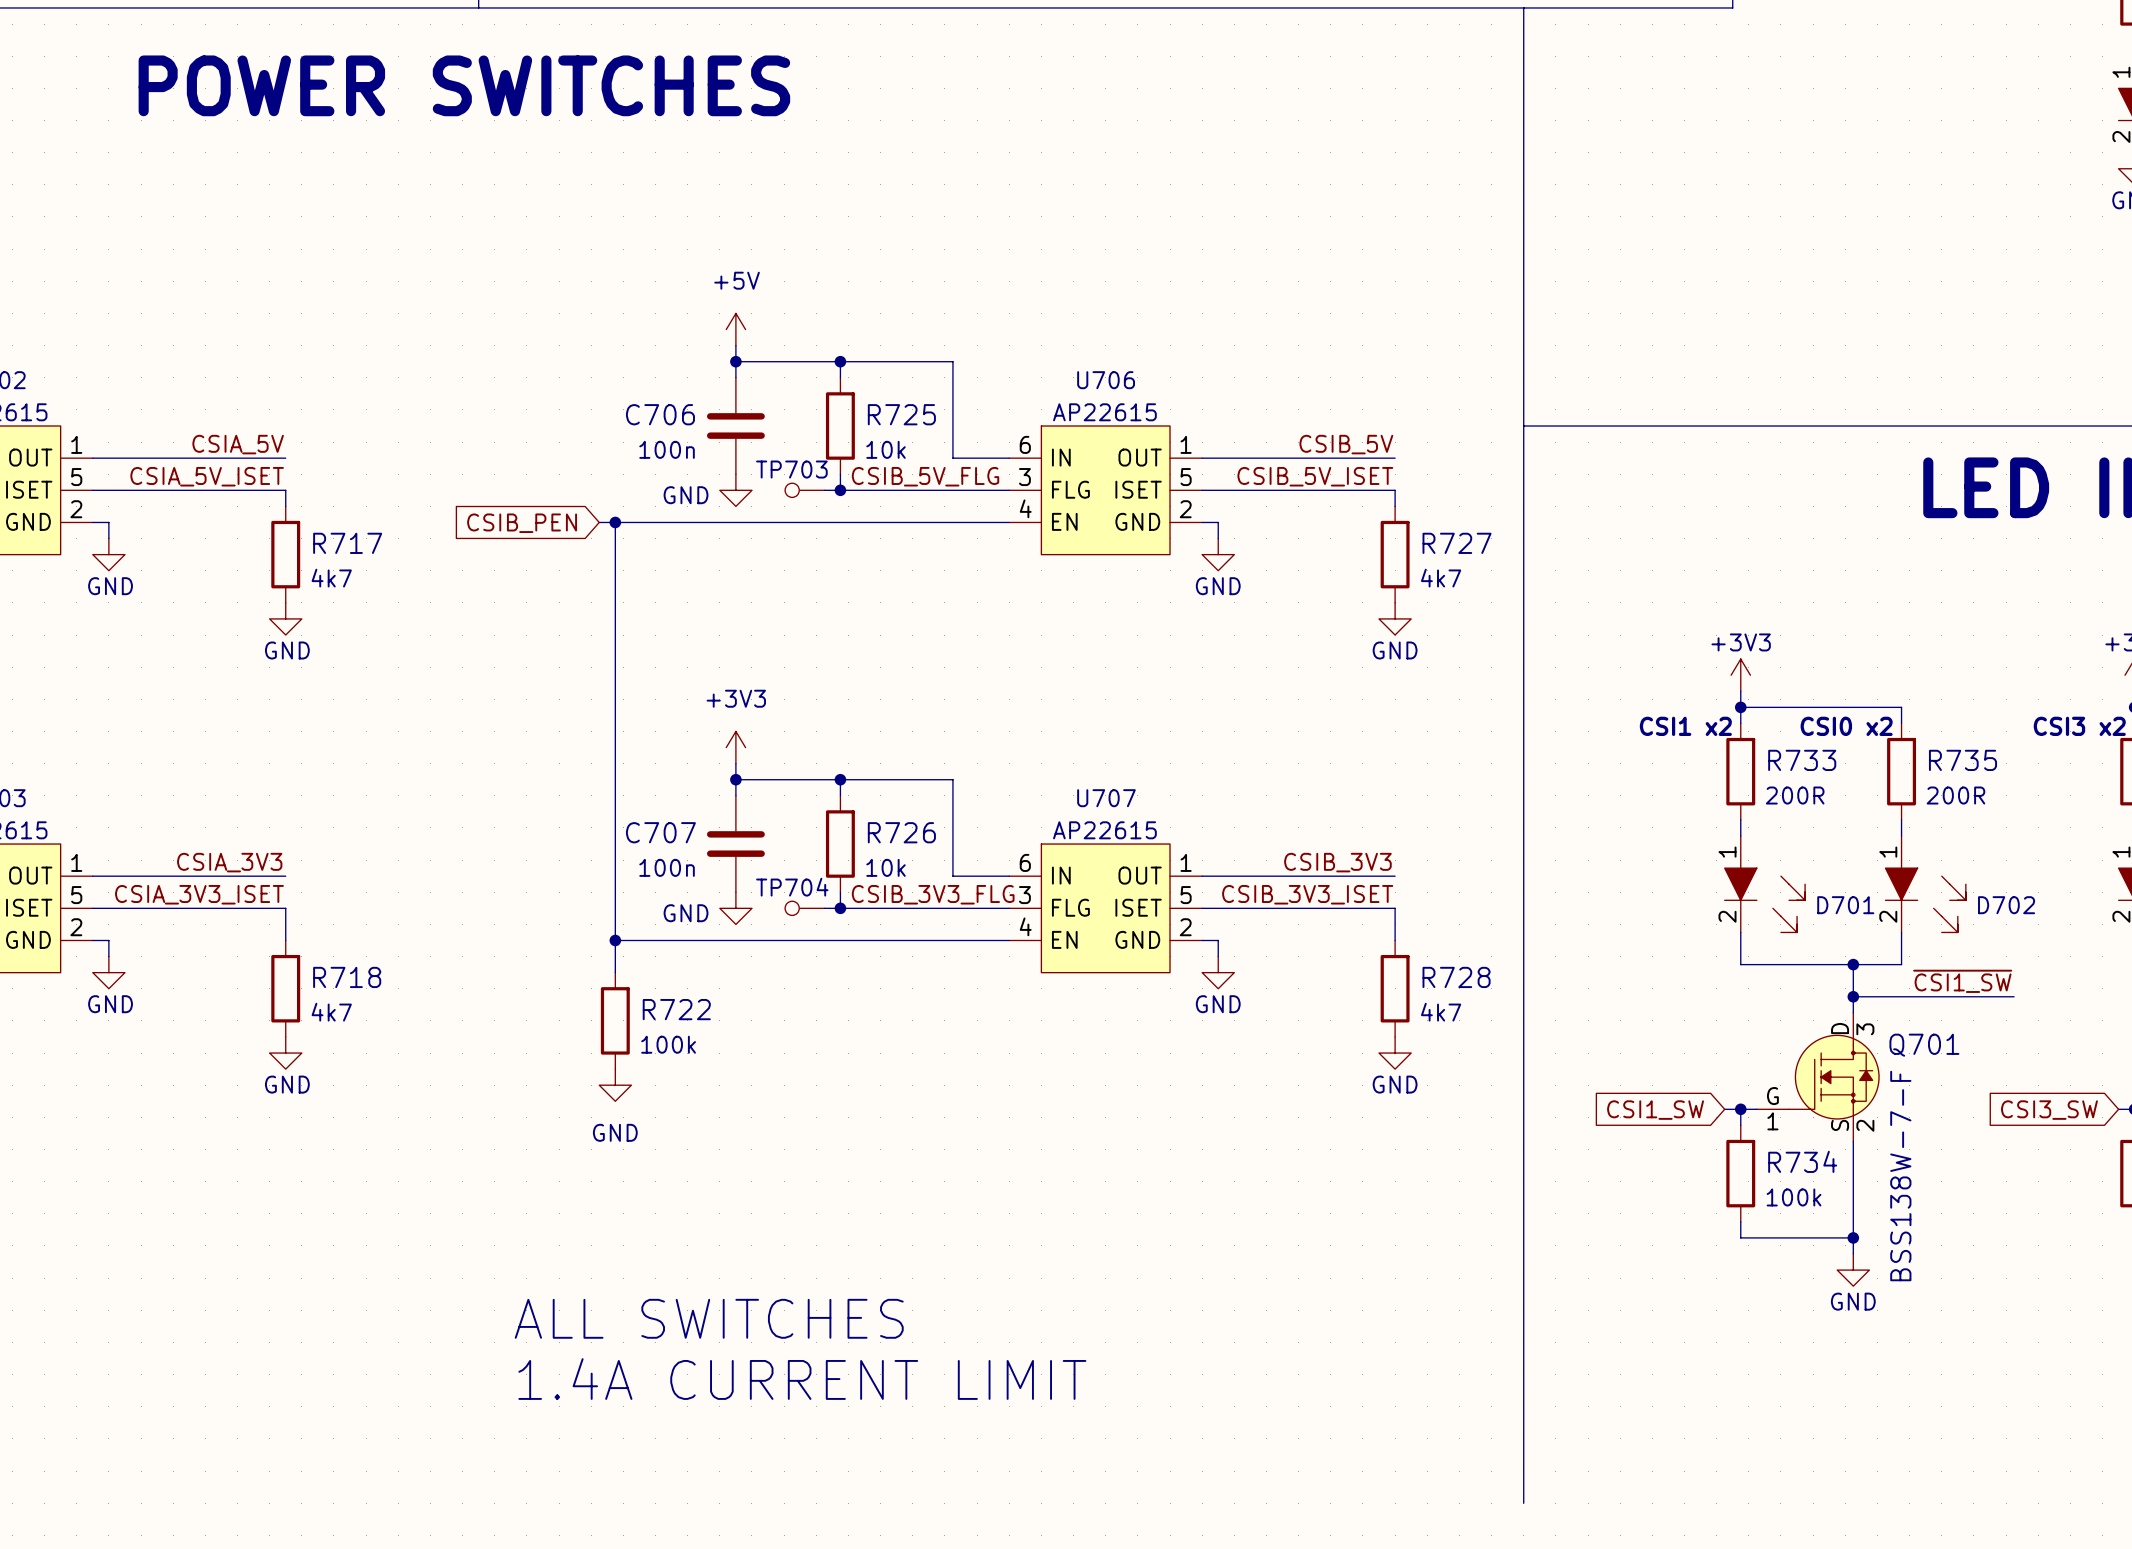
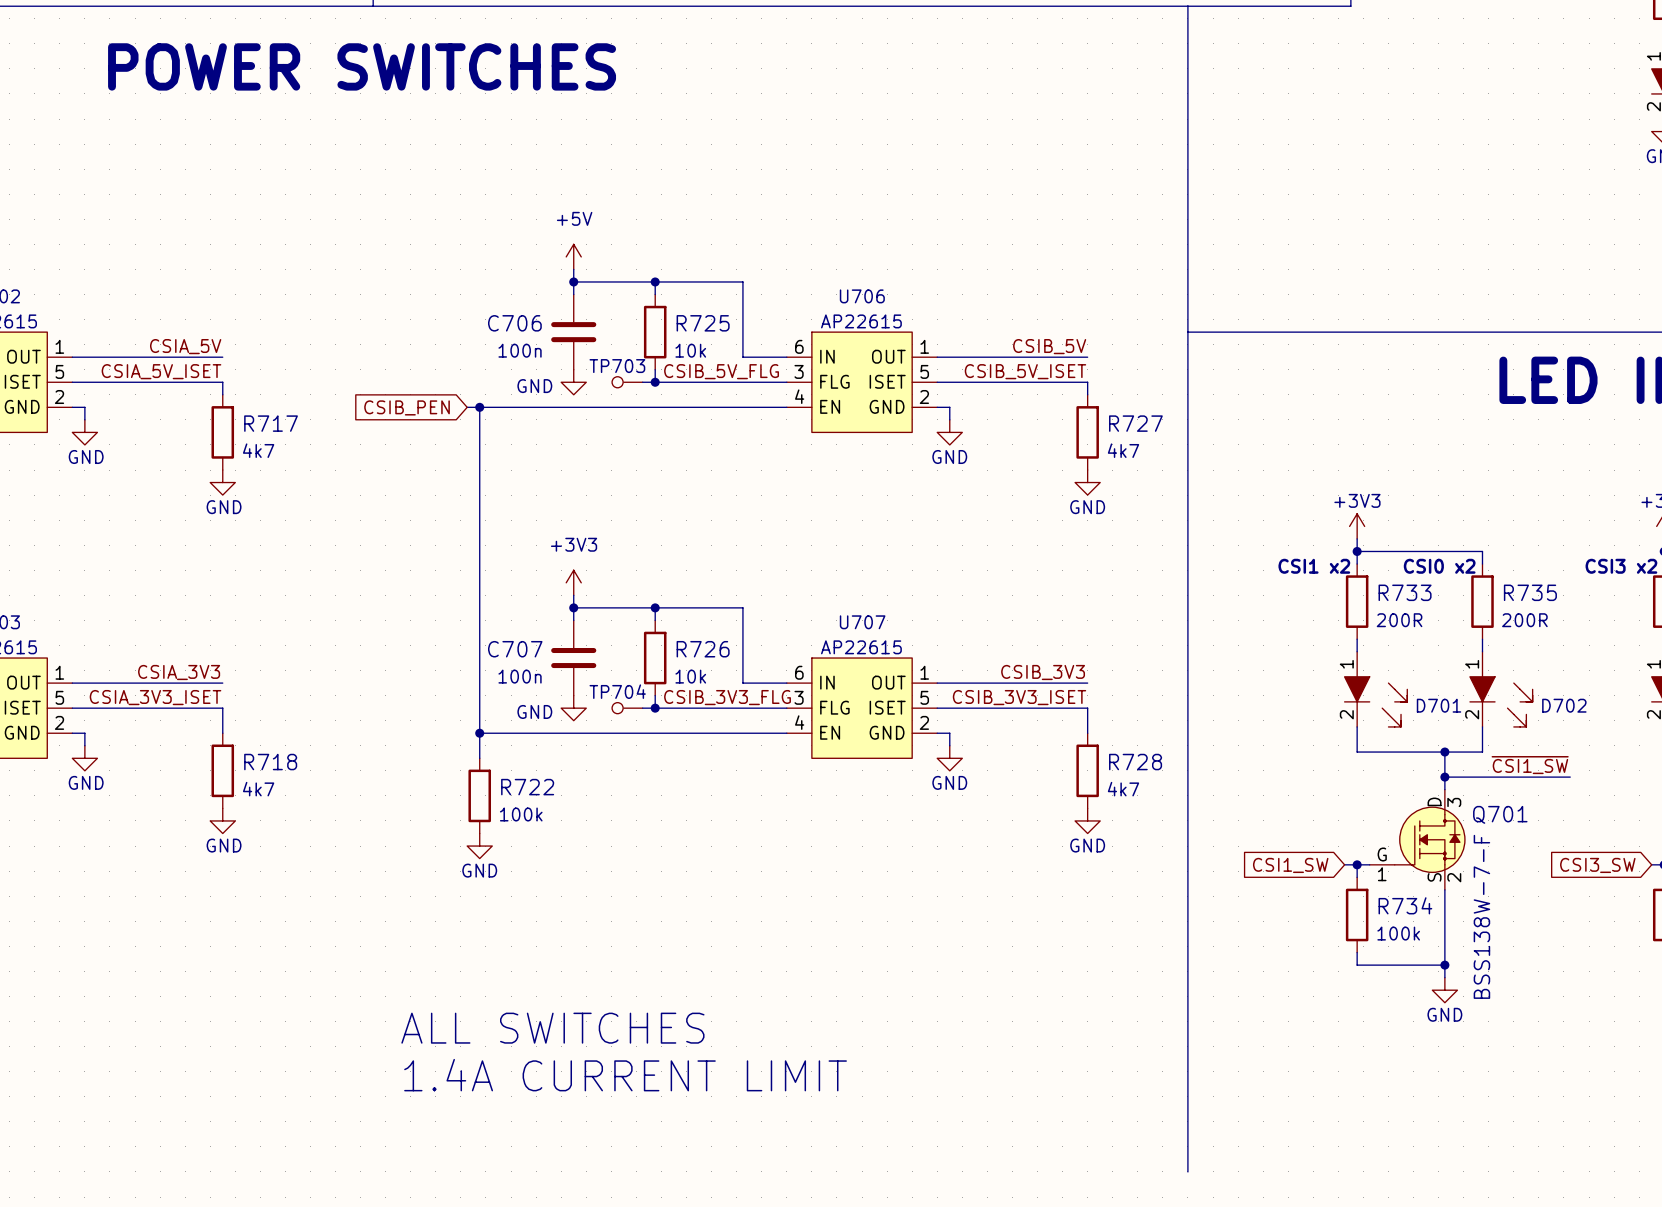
power symbol text position: GND (615, 1132) -> GND (479, 870)

